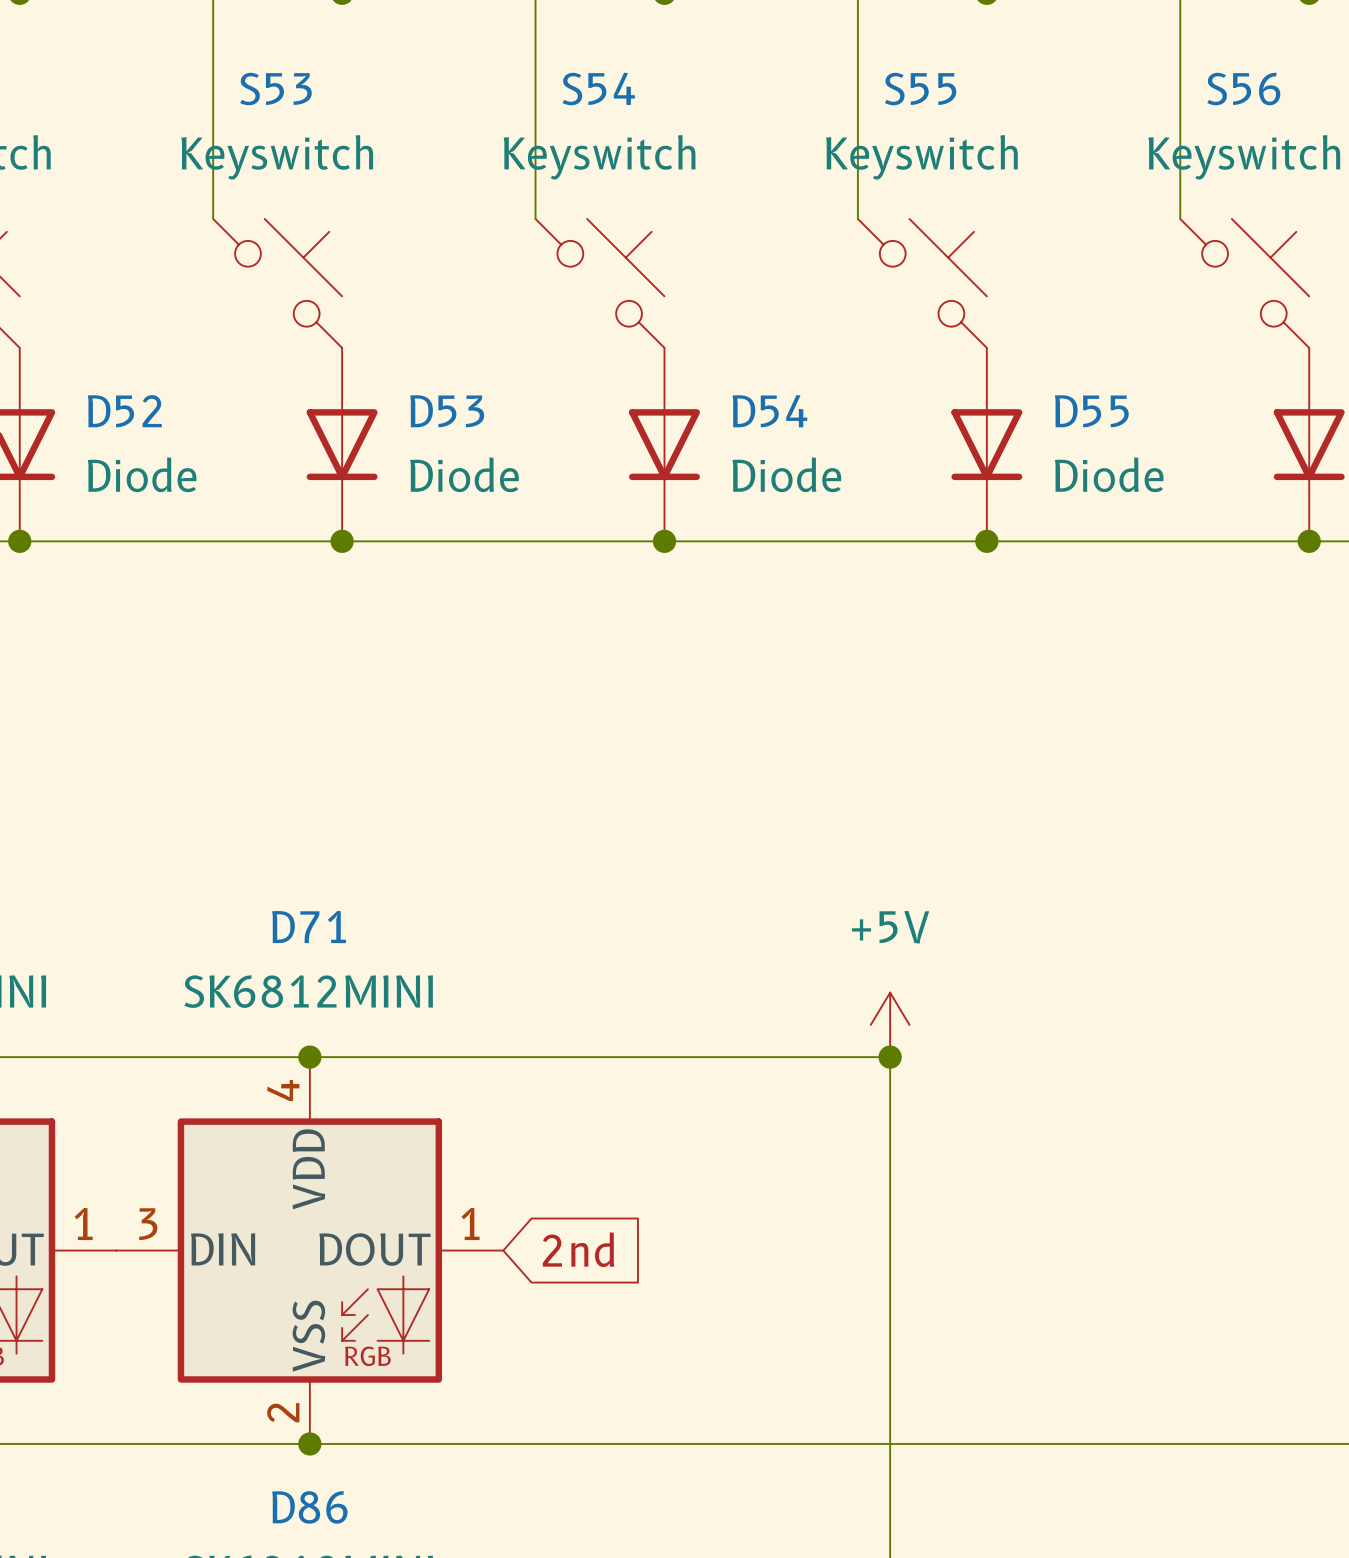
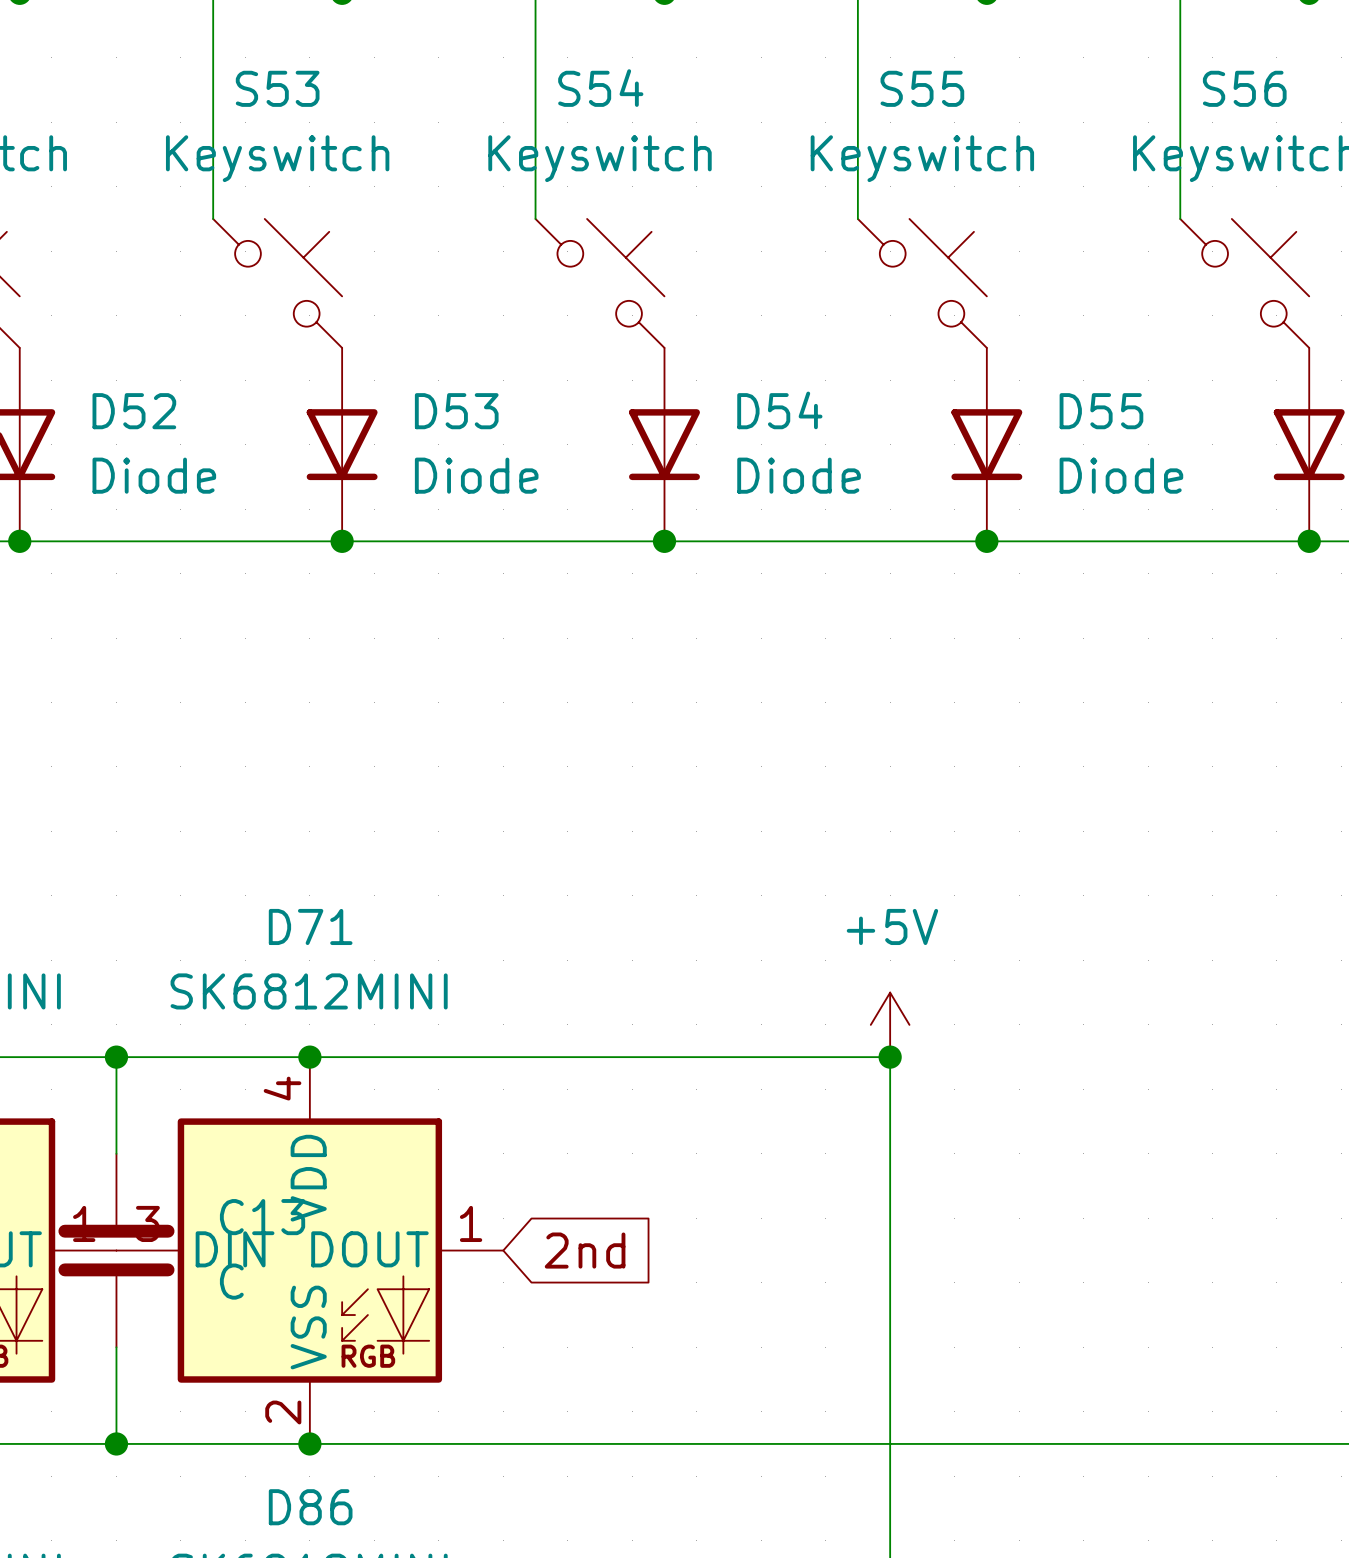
wire: none -> (116, 1057) (116, 1153)
junction: none -> (116, 1057)
C13: none -> C (116, 1250)
wire: none -> (116, 1347) (116, 1443)
junction: none -> (116, 1443)

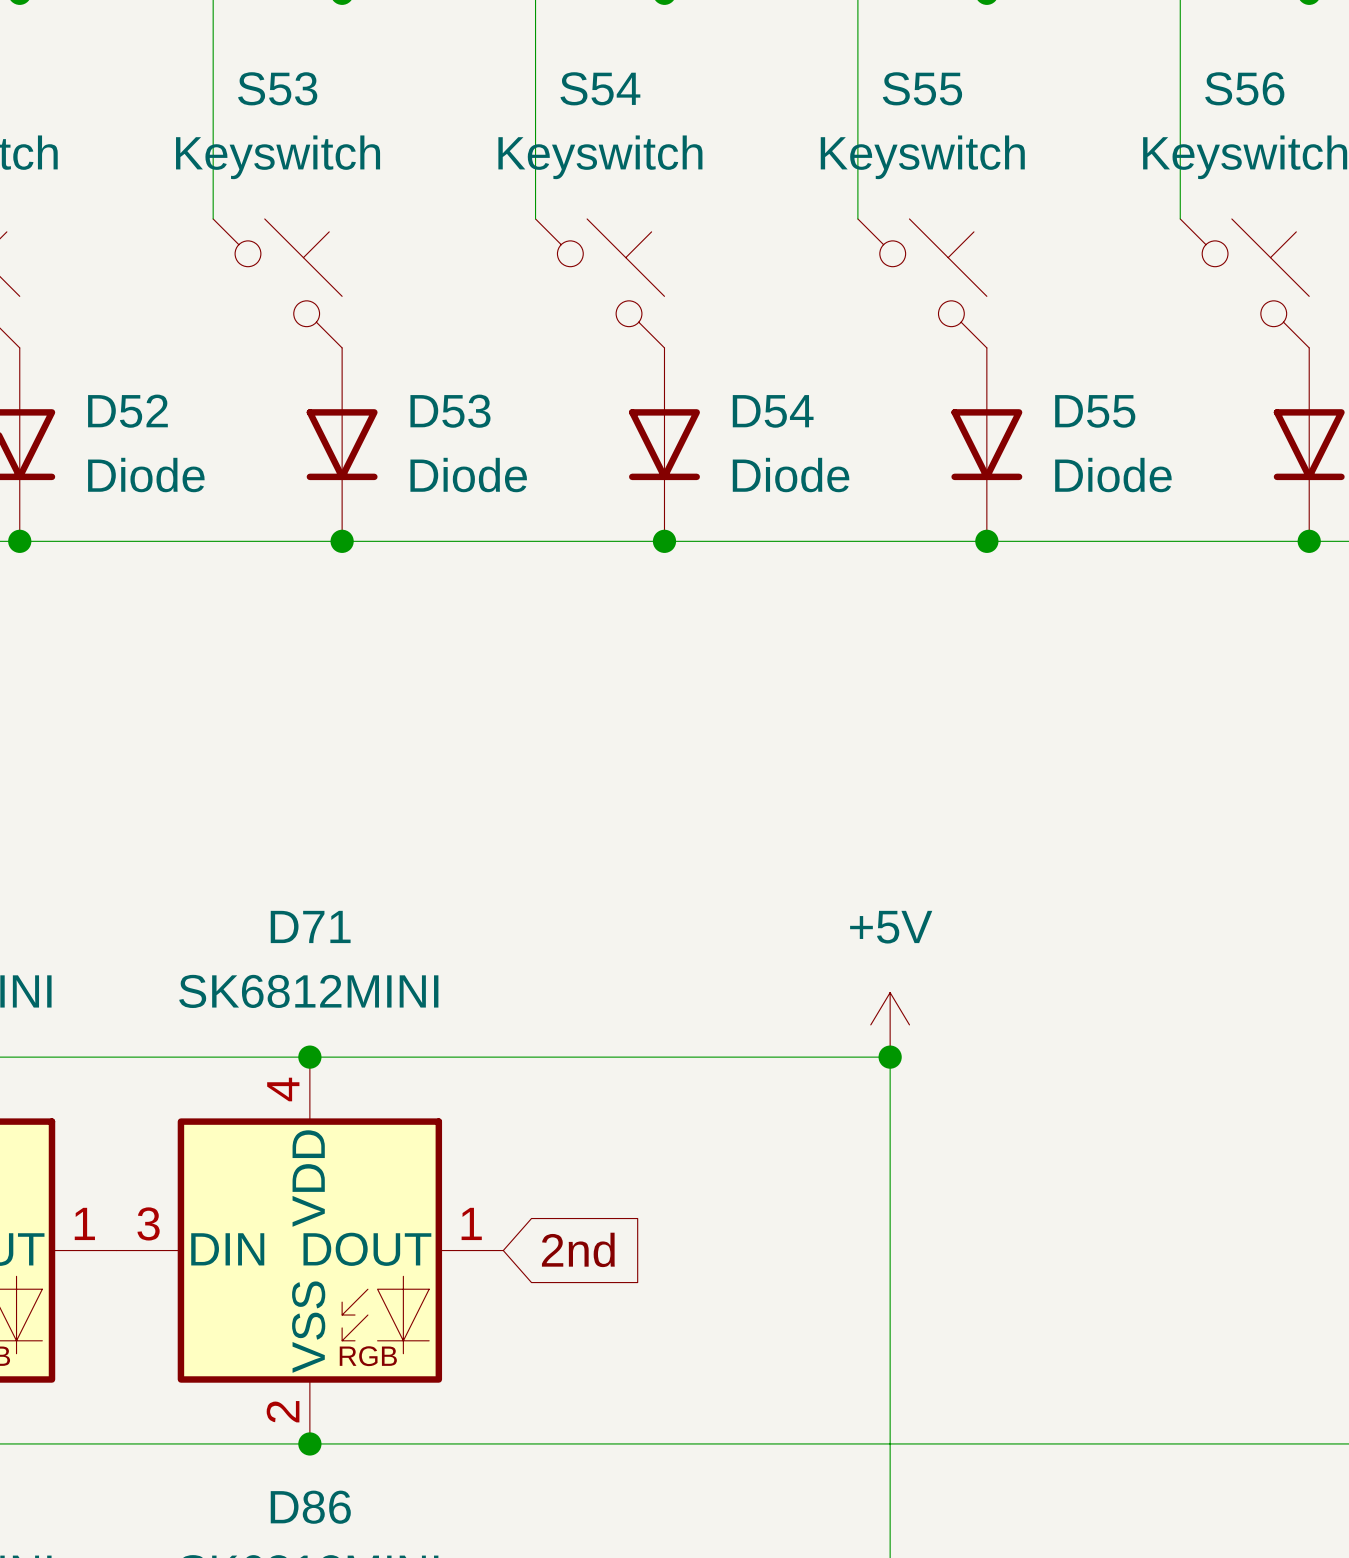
wire: (116, 1057) (116, 1153) -> none
junction: (116, 1057) -> none
C13: C (116, 1250) -> none
wire: (116, 1347) (116, 1443) -> none
junction: (116, 1443) -> none

